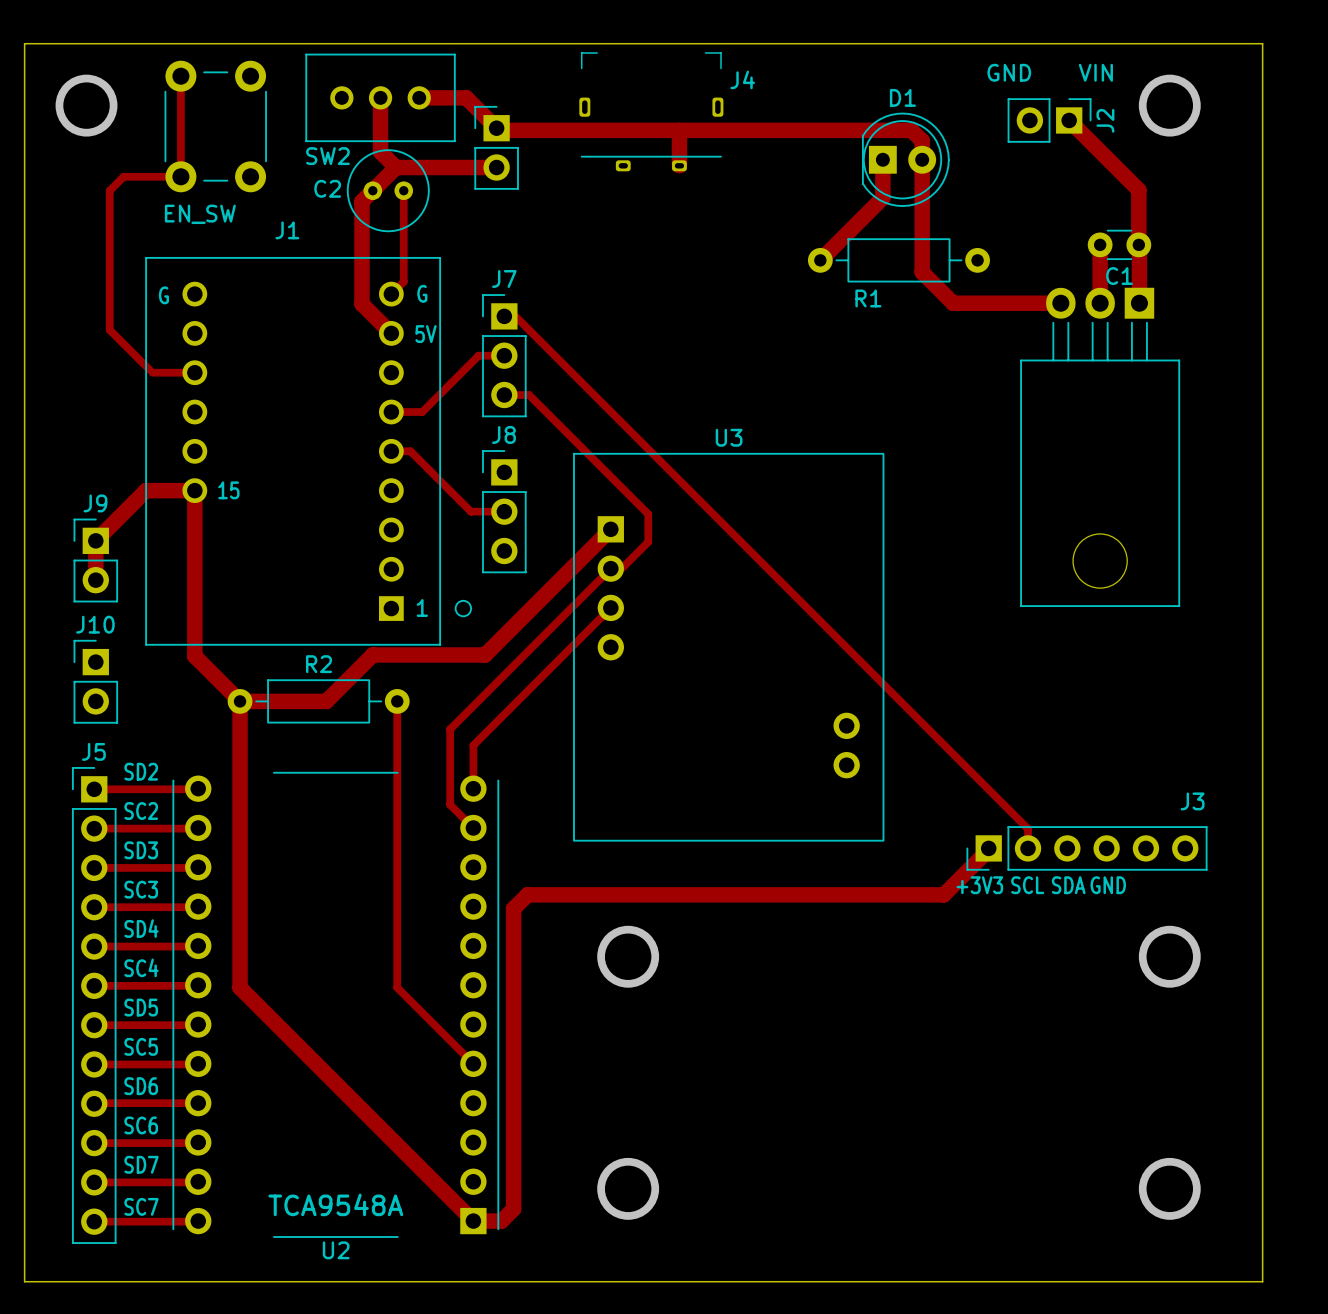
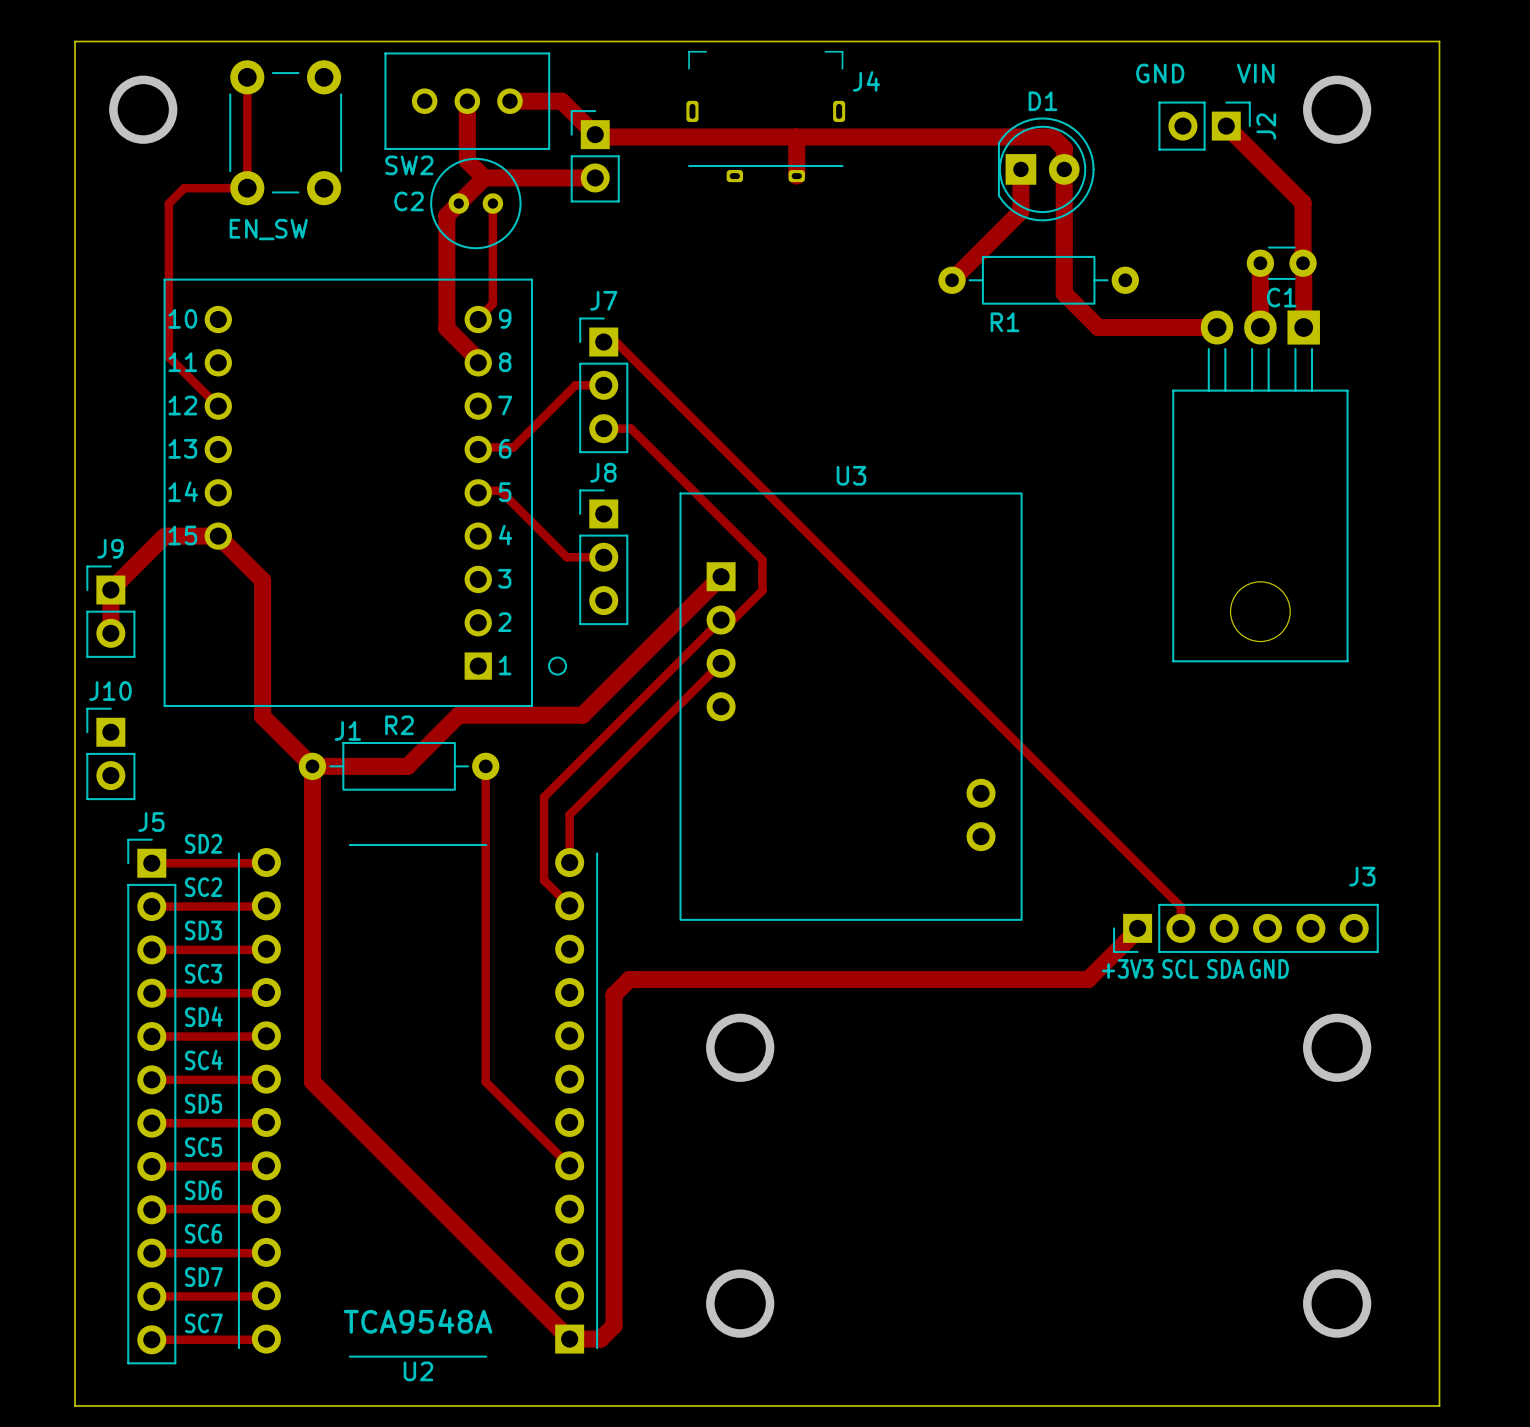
J1 name position: J1 (287, 230) -> J1 (347, 730)
J1 footprint: [145, 256, 473, 646] -> [163, 278, 568, 708]
text: G (163, 295) -> none
track: (152, 372) (194, 372) -> none
track: (194, 532) (194, 490) (146, 490) (95, 540) (95, 580) -> (262, 580) (218, 536) (165, 536) (110, 590) (110, 633)
J9 position: (95, 560) -> (110, 611)
J10 position: (95, 681) -> (110, 753)

